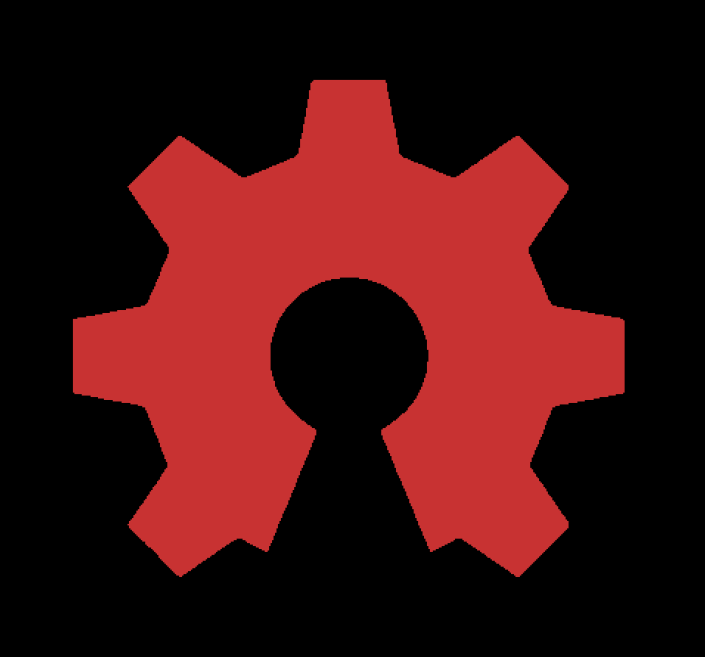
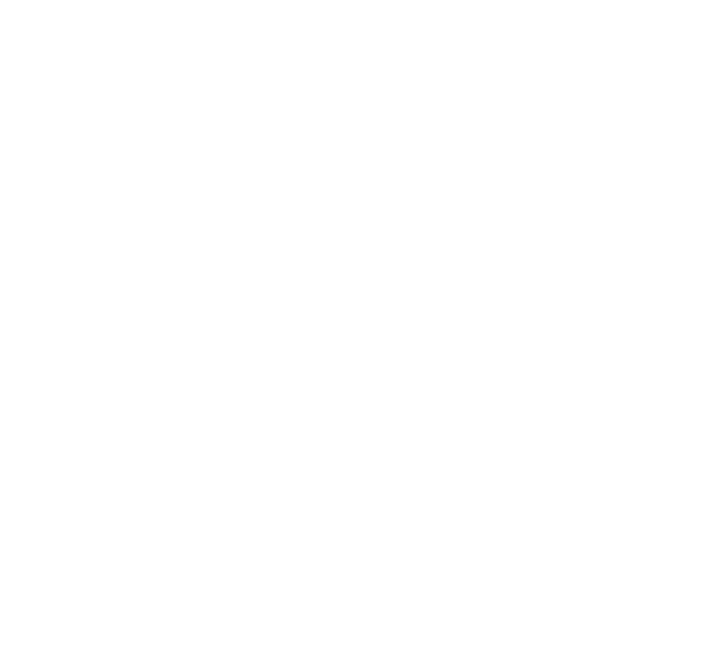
part: (348, 328) -> none

